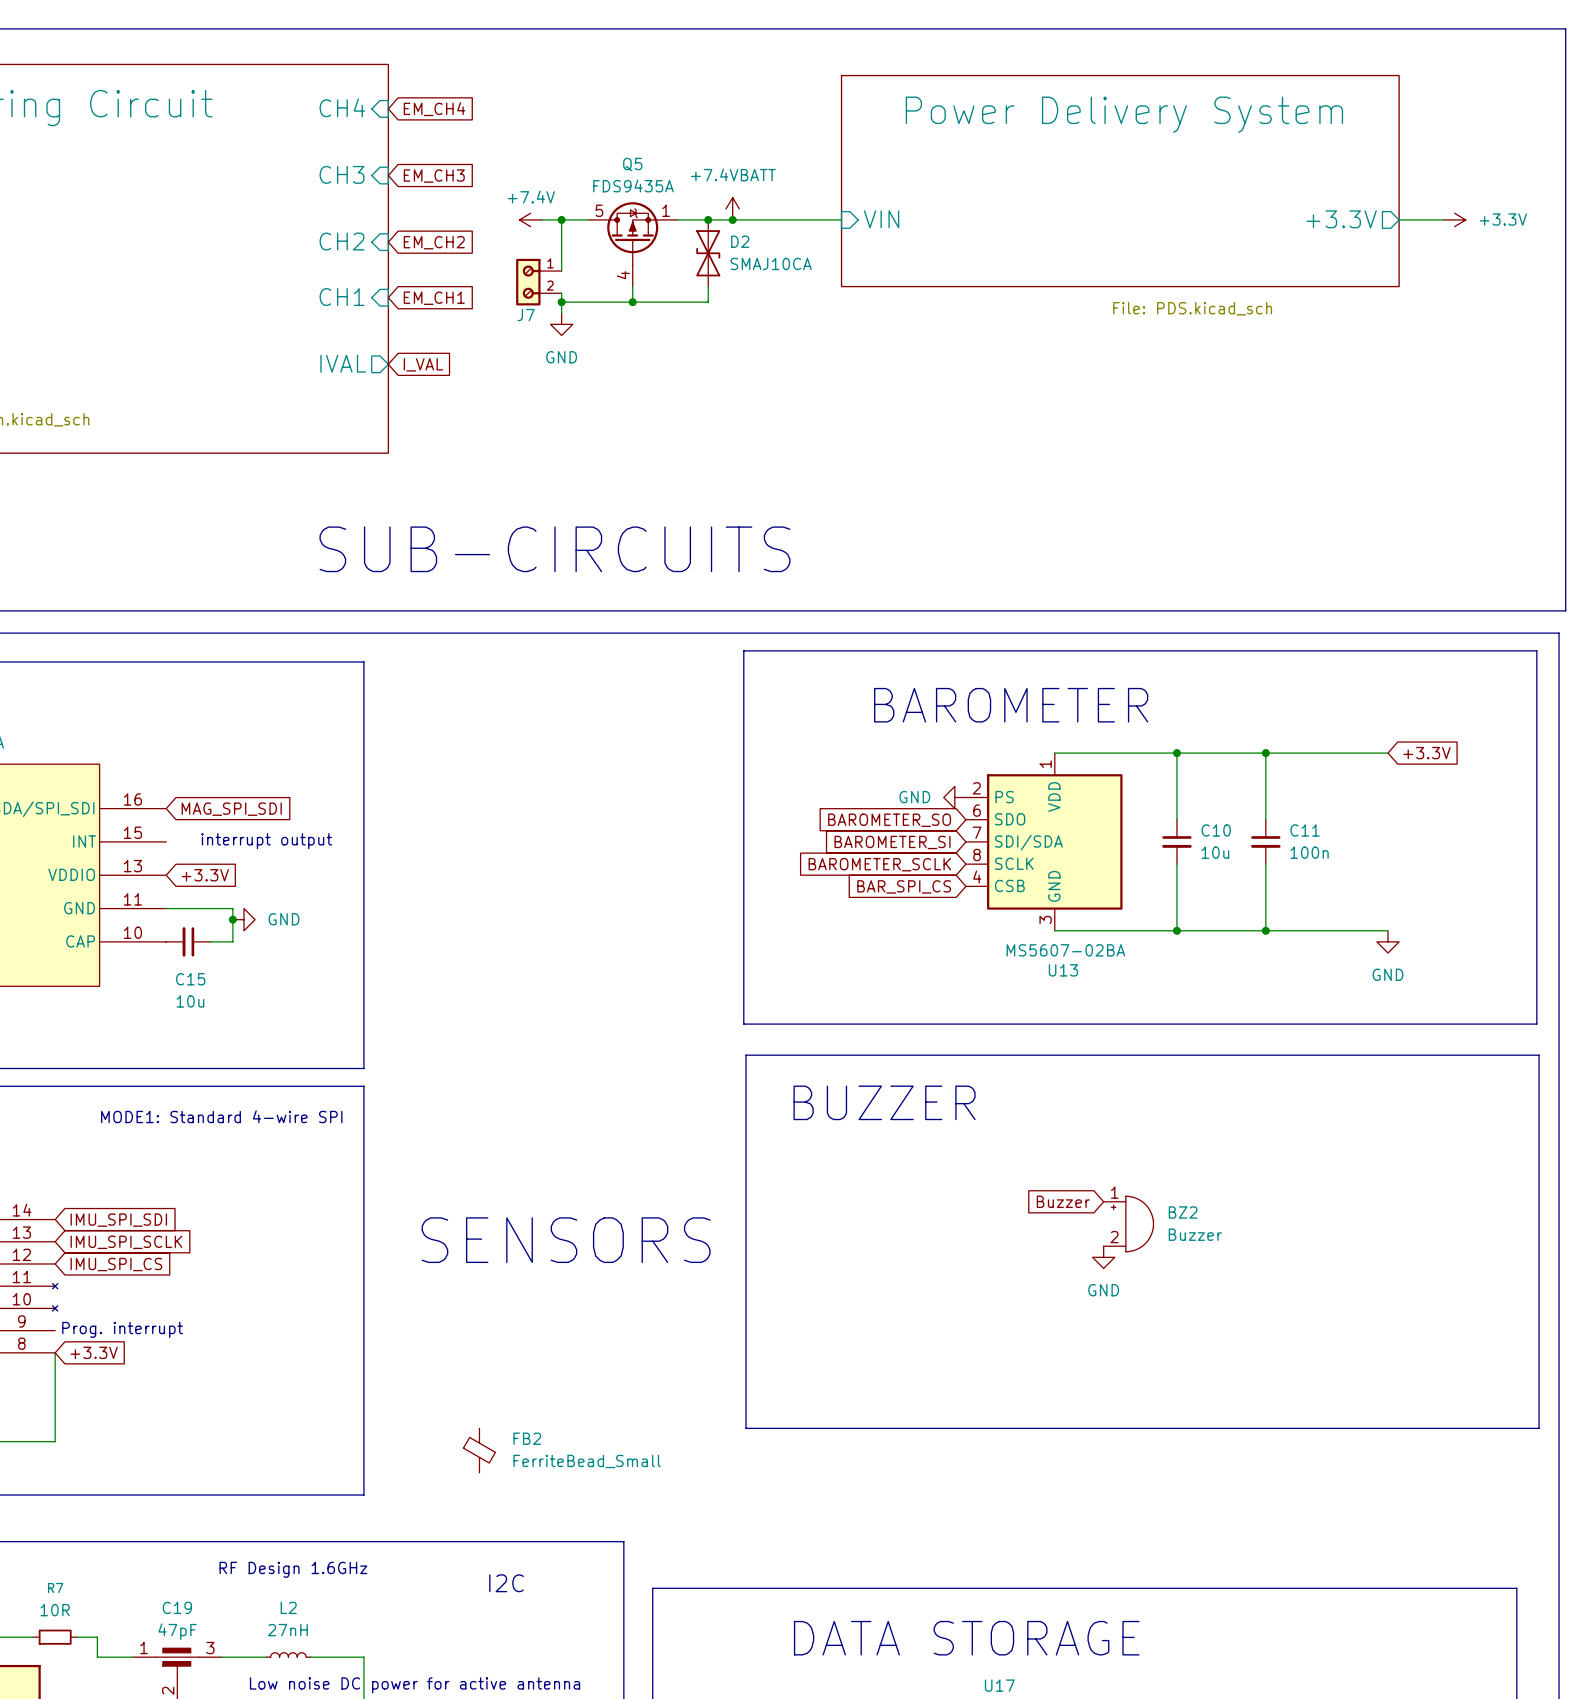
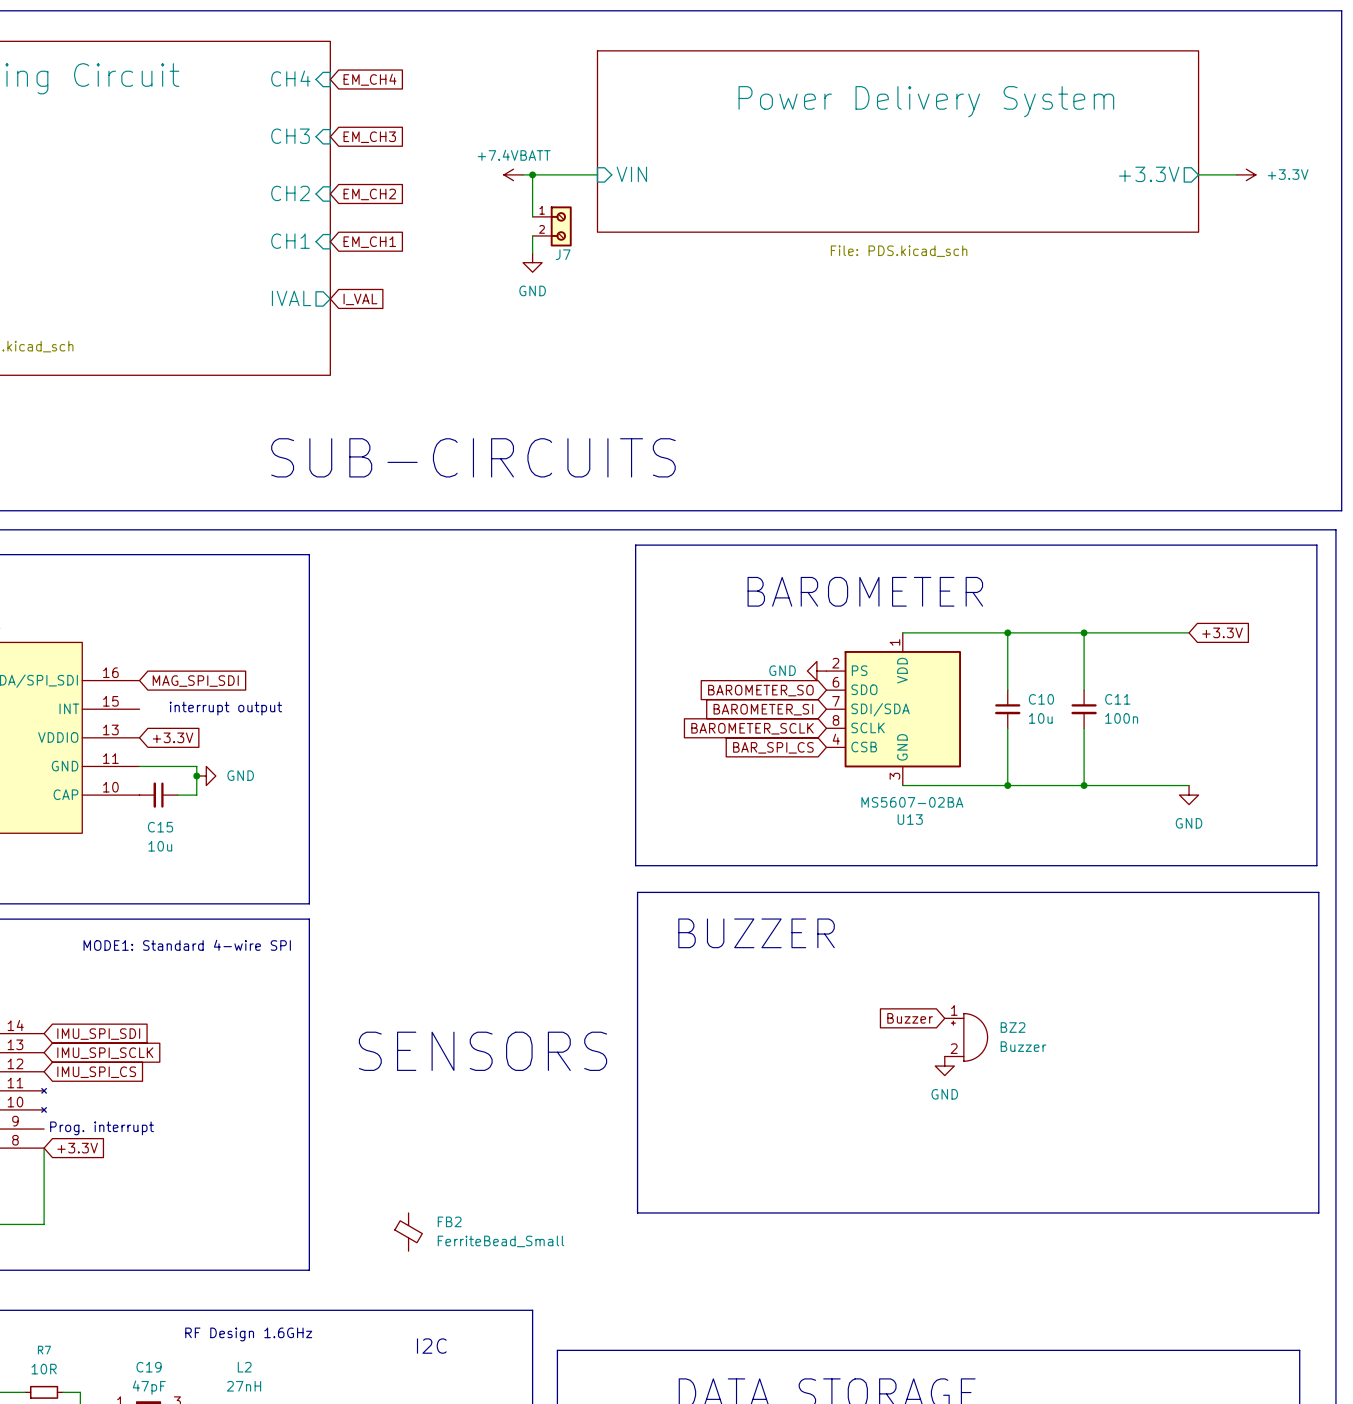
sheet Power Delivery System: none -> File: PDS.kicad_sch (898, 141)
sheet Power Delivery System: File: PDS.kicad_sch (1120, 181) -> none
power symbol rotation: 0° (732, 208) -> 90° counterclockwise (513, 174)
power symbol position: +7.4VBATT (732, 208) -> +7.4VBATT (513, 174)
power symbol: +7.4V (530, 219) -> none
wire: (541, 219) (588, 219) -> none
wire: (561, 219) (561, 271) -> none
junction: (561, 219) -> none
wire: none -> (532, 174) (532, 216)
junction: none -> (532, 174)
wire: (699, 219) (841, 219) -> none
junction: (708, 219) -> none
junction: (732, 219) -> none
sheet pin position: VIN (881, 219) -> VIN (631, 174)
Q5: FDS9435A (632, 244) -> none
D2: SMAJ10CA (708, 253) -> none
J7 flip: as is (528, 282) -> left-right (561, 226)
J7 position: (538, 282) -> (552, 226)
wire: (632, 286) (632, 302) -> none
wire: (708, 286) (708, 302) (561, 302) -> none
wire: (561, 293) (561, 313) -> (532, 235) (532, 253)
junction: (561, 302) -> none
junction: (632, 302) -> none
power symbol position: GND (561, 324) -> GND (532, 262)

